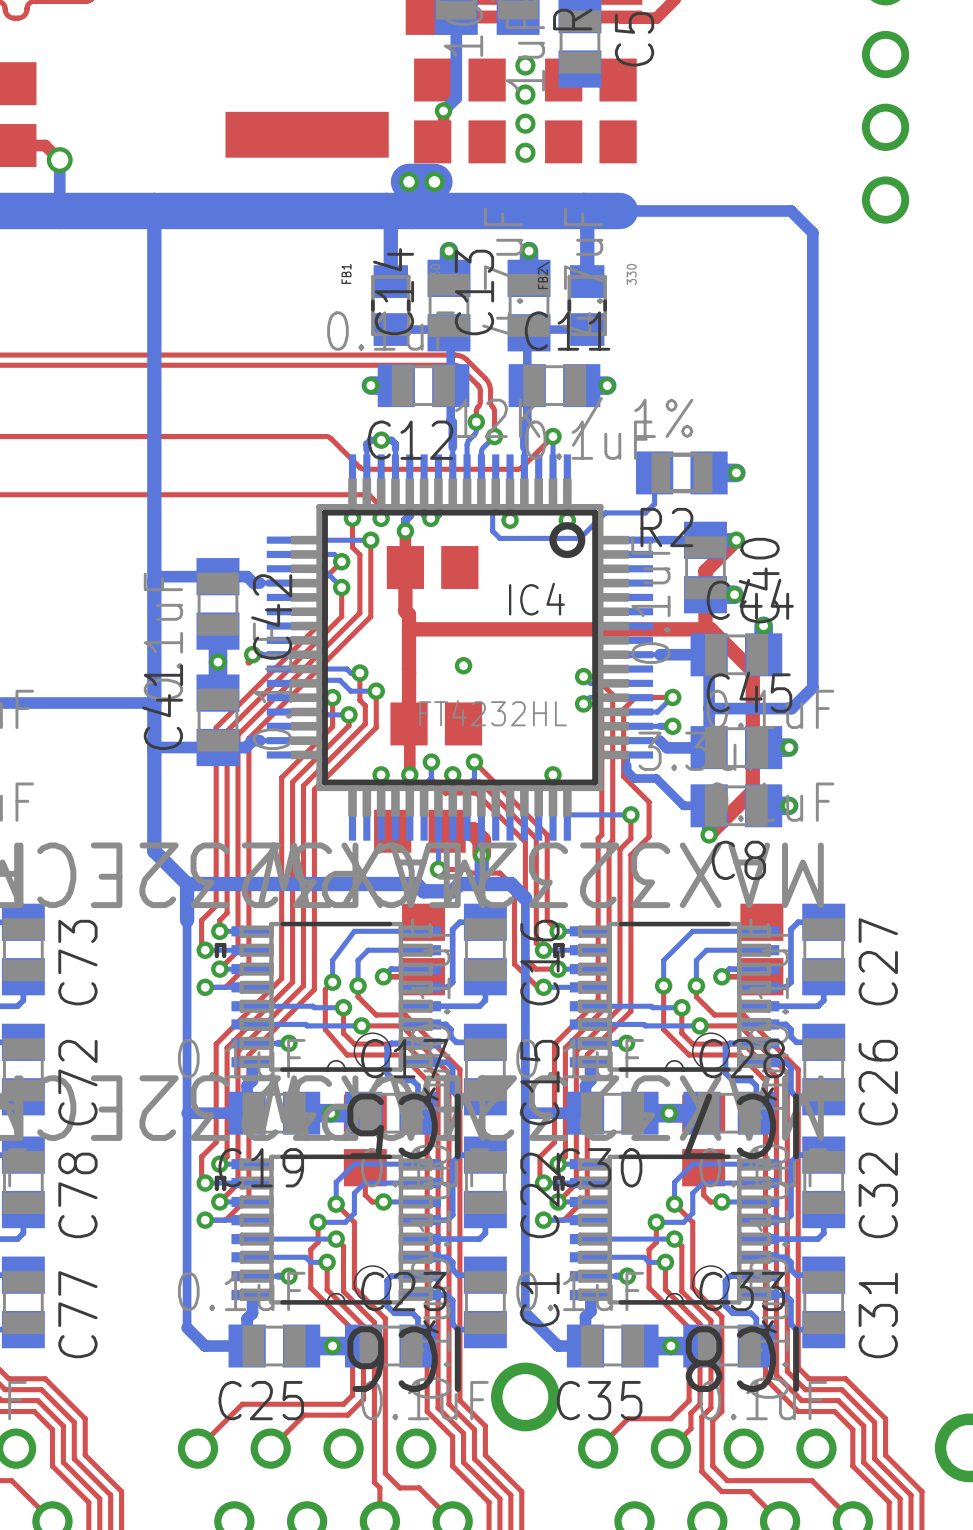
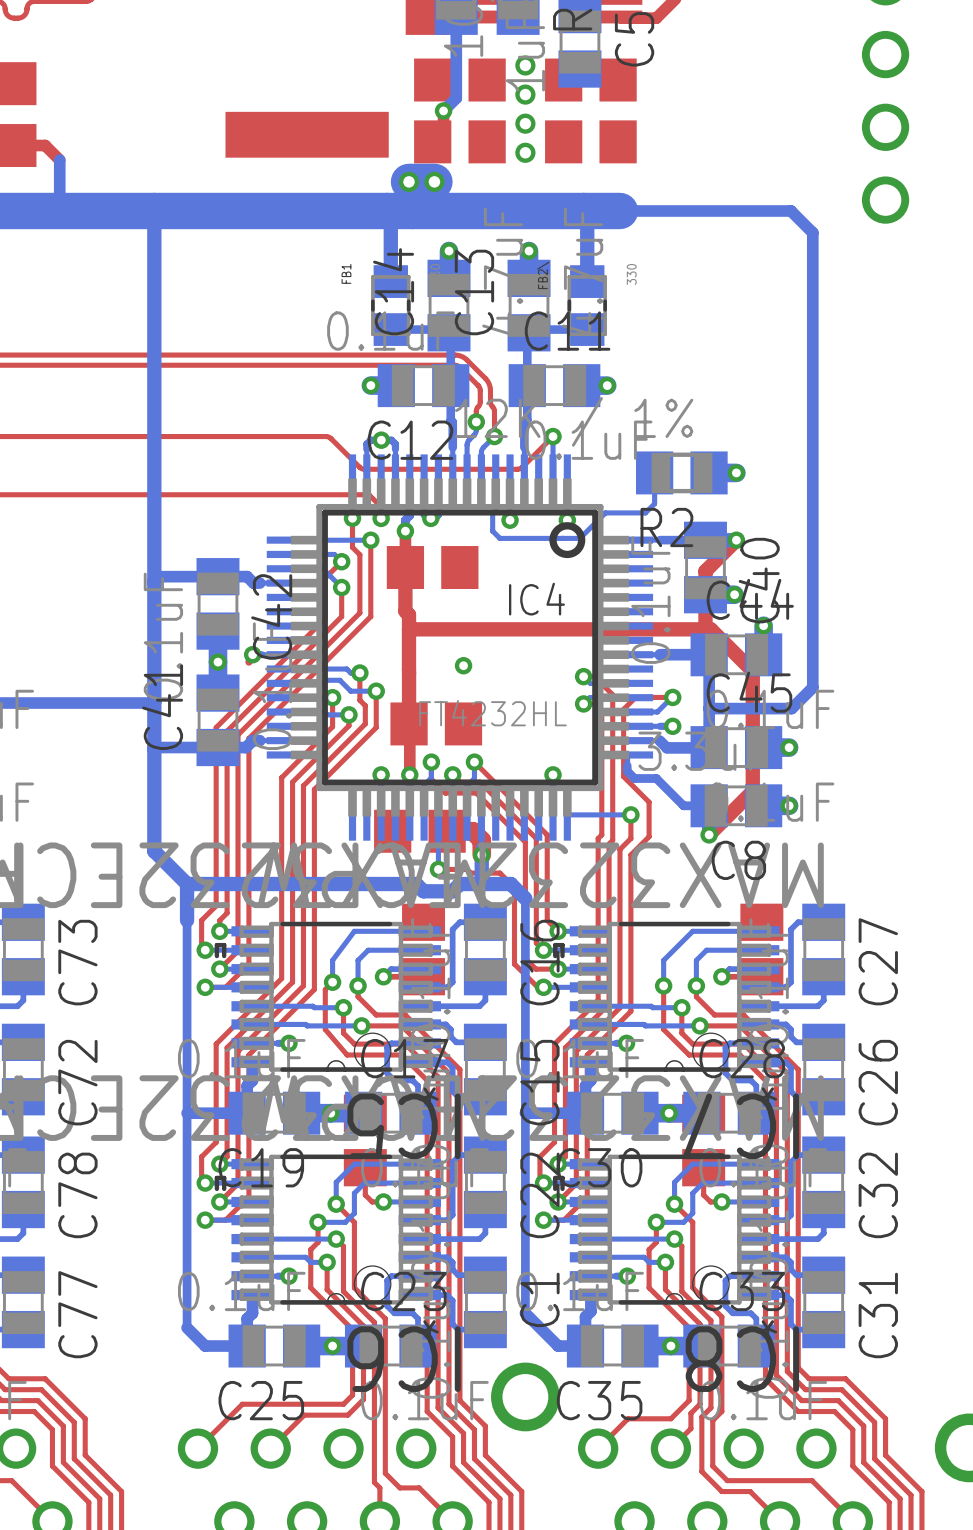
via: (59, 160) -> none

